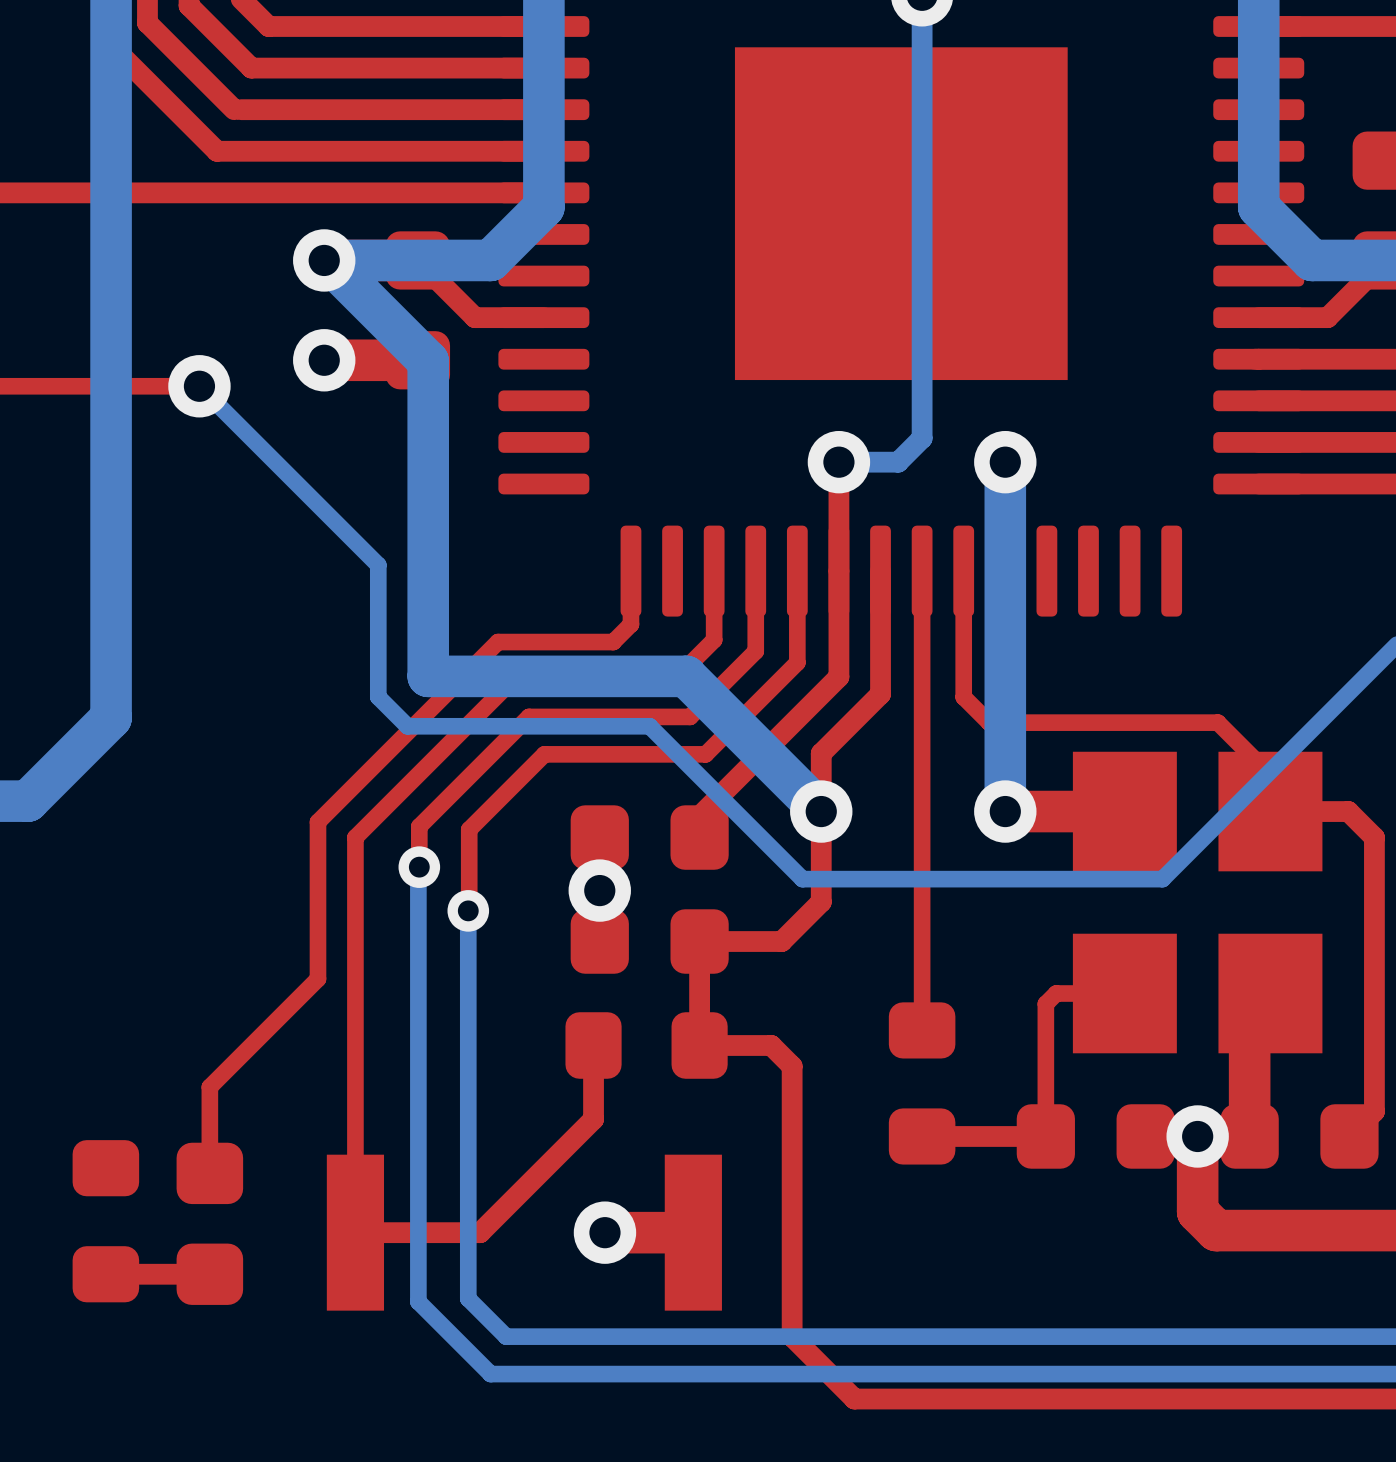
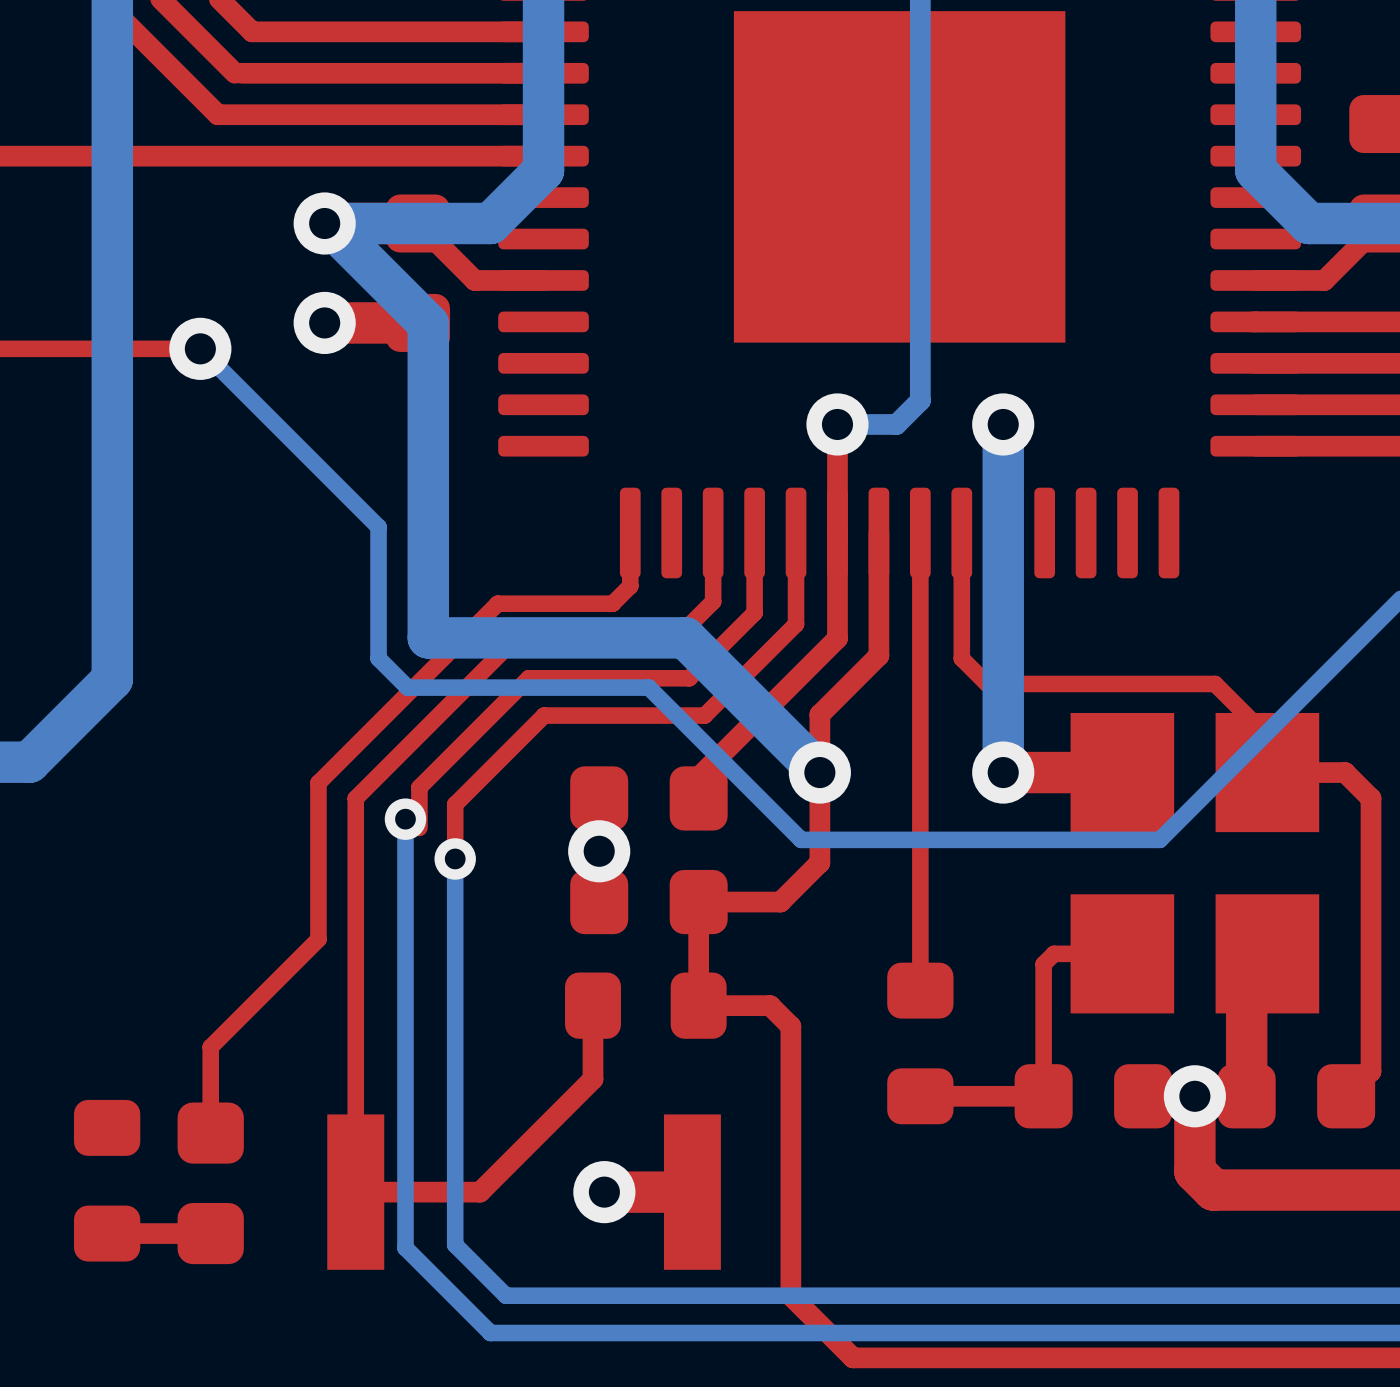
top track: (469, 829) (469, 909) -> (469, 790) (455, 804) (455, 858)
via position: (419, 867) -> (405, 819)
bottom track: (418, 868) (418, 1301) -> (405, 819) (405, 1247) (418, 1260)
bottom track: (468, 910) (468, 1298) -> (455, 858) (455, 1244) (468, 1257)
via position: (468, 910) -> (455, 858)

